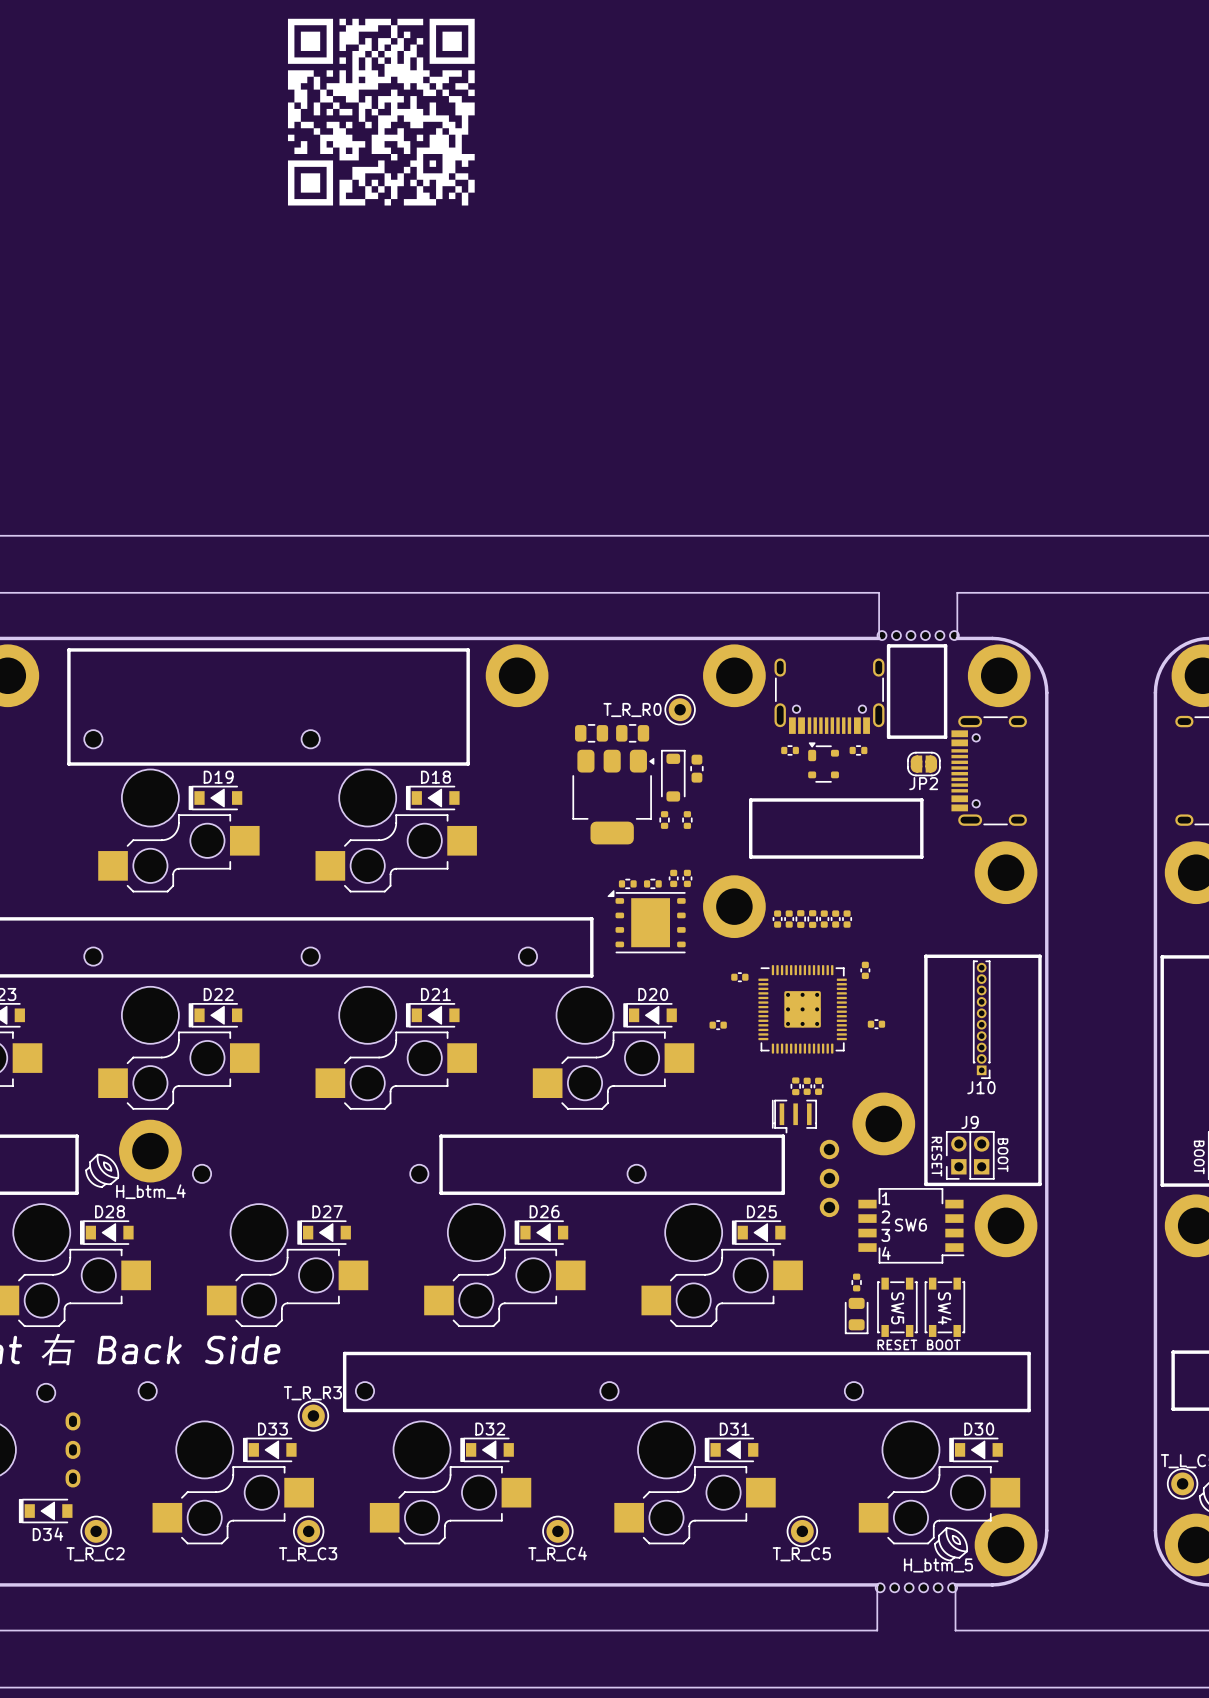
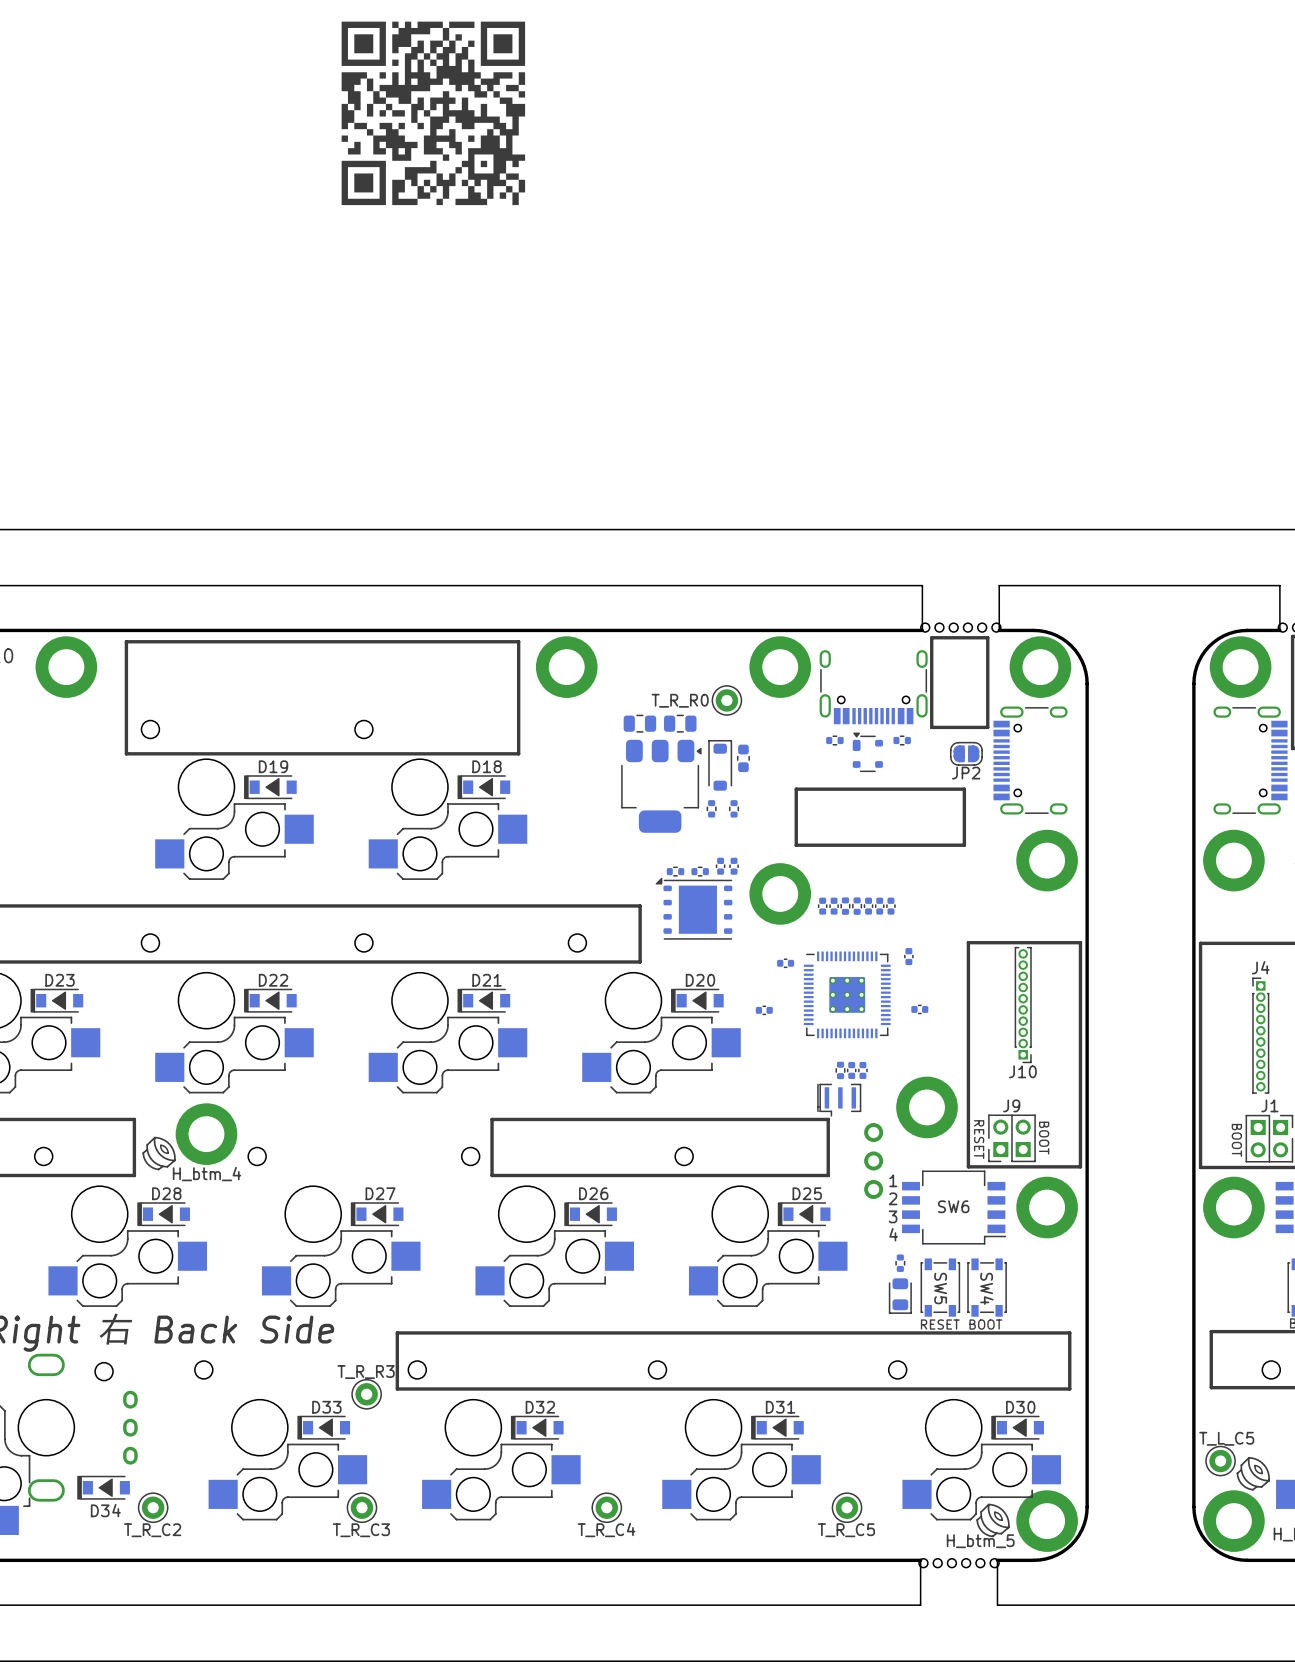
text position: 1 (886, 1198) -> 1 (893, 1180)
text position: 2 (885, 1217) -> 2 (893, 1198)
text position: 3 (885, 1235) -> 3 (893, 1216)
text position: 4 (886, 1253) -> 4 (893, 1234)

